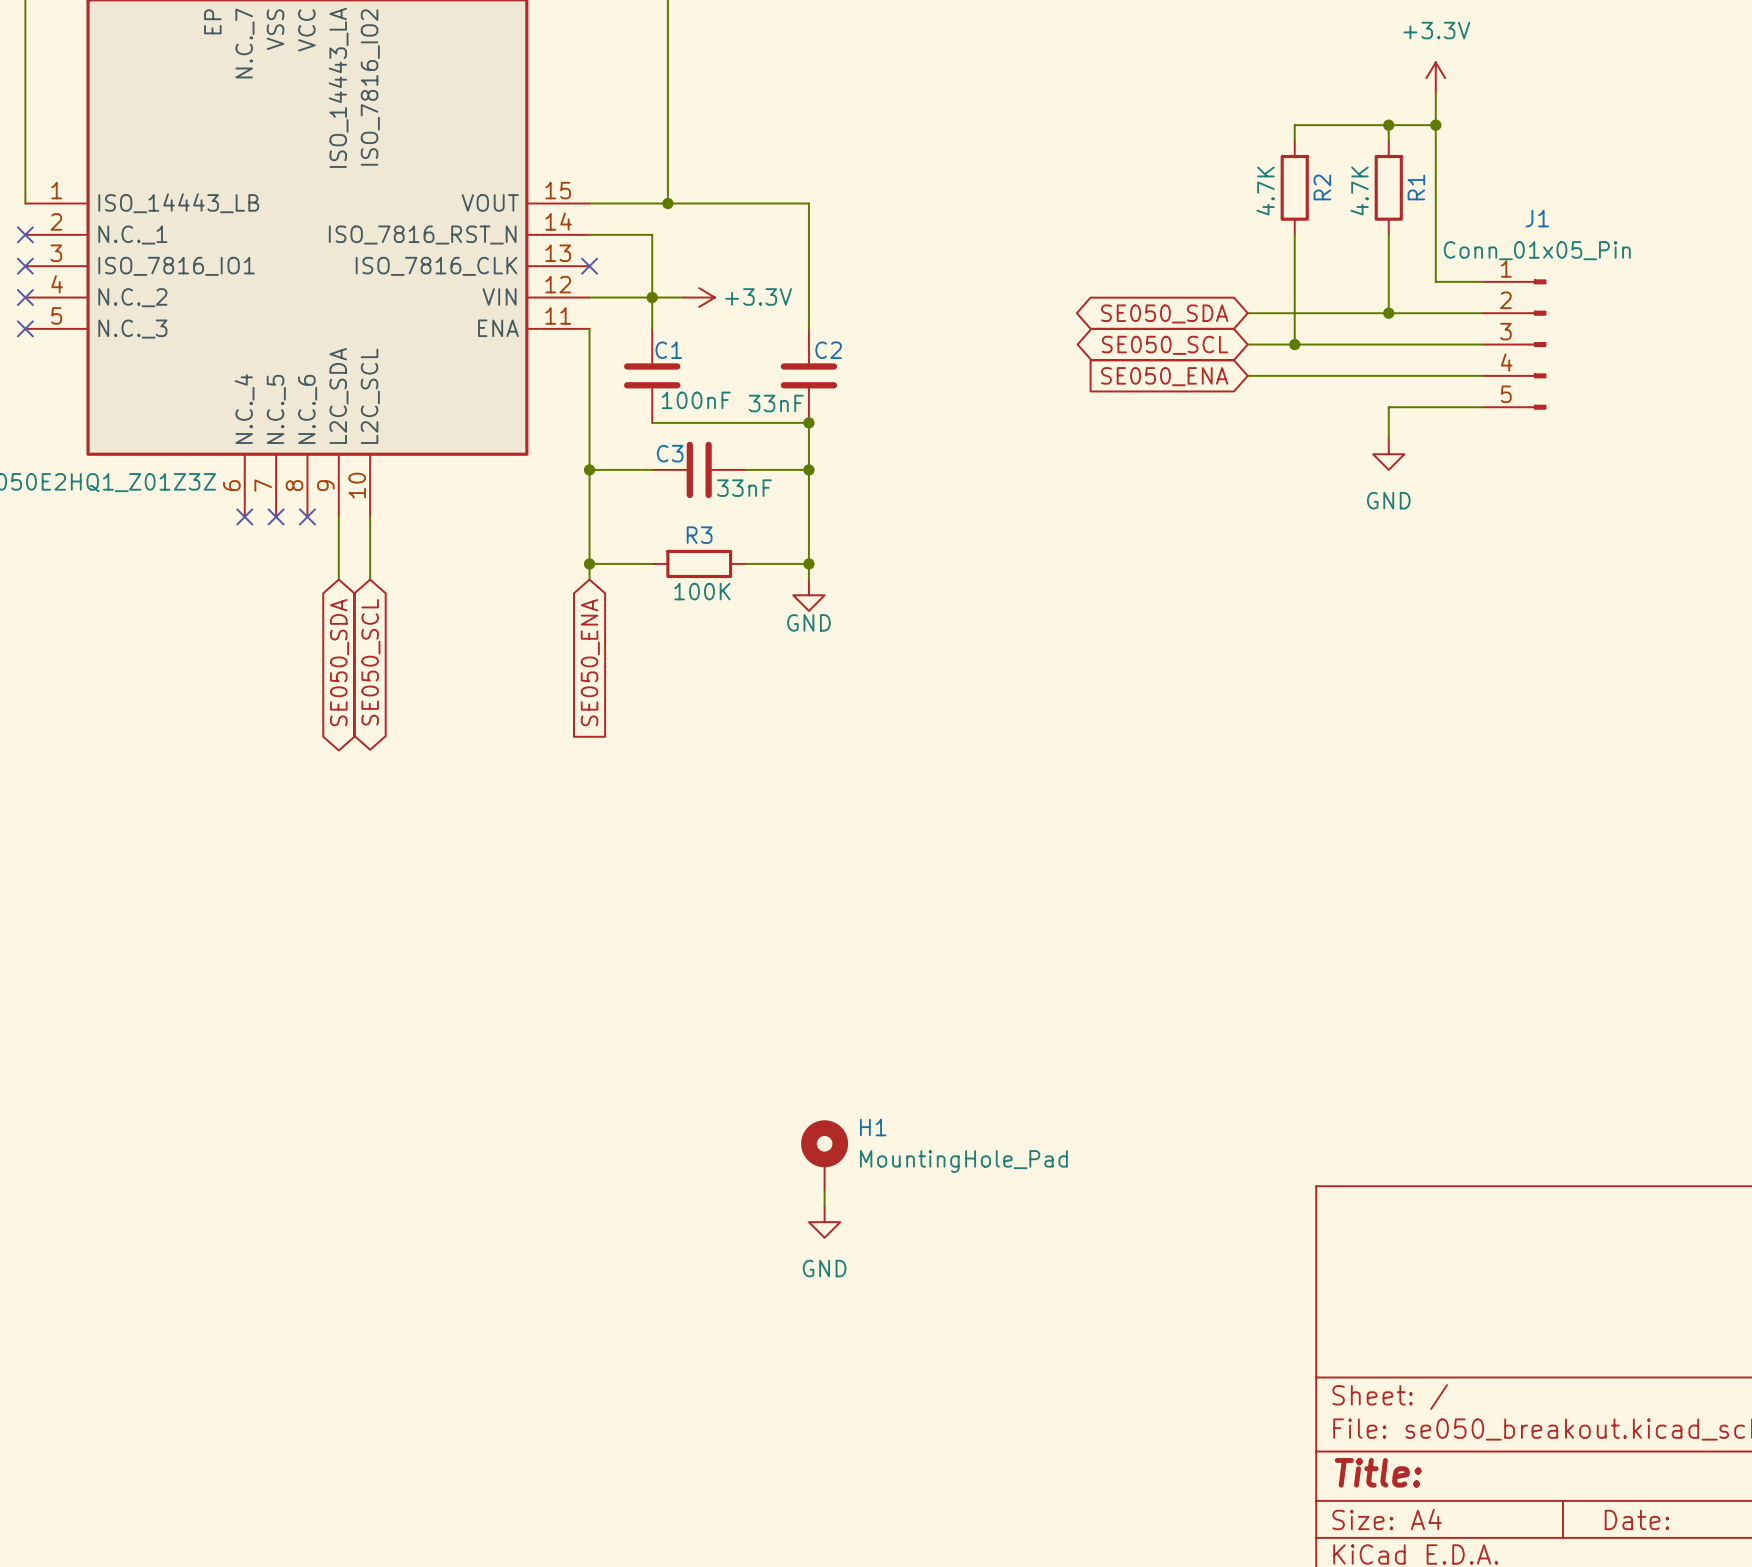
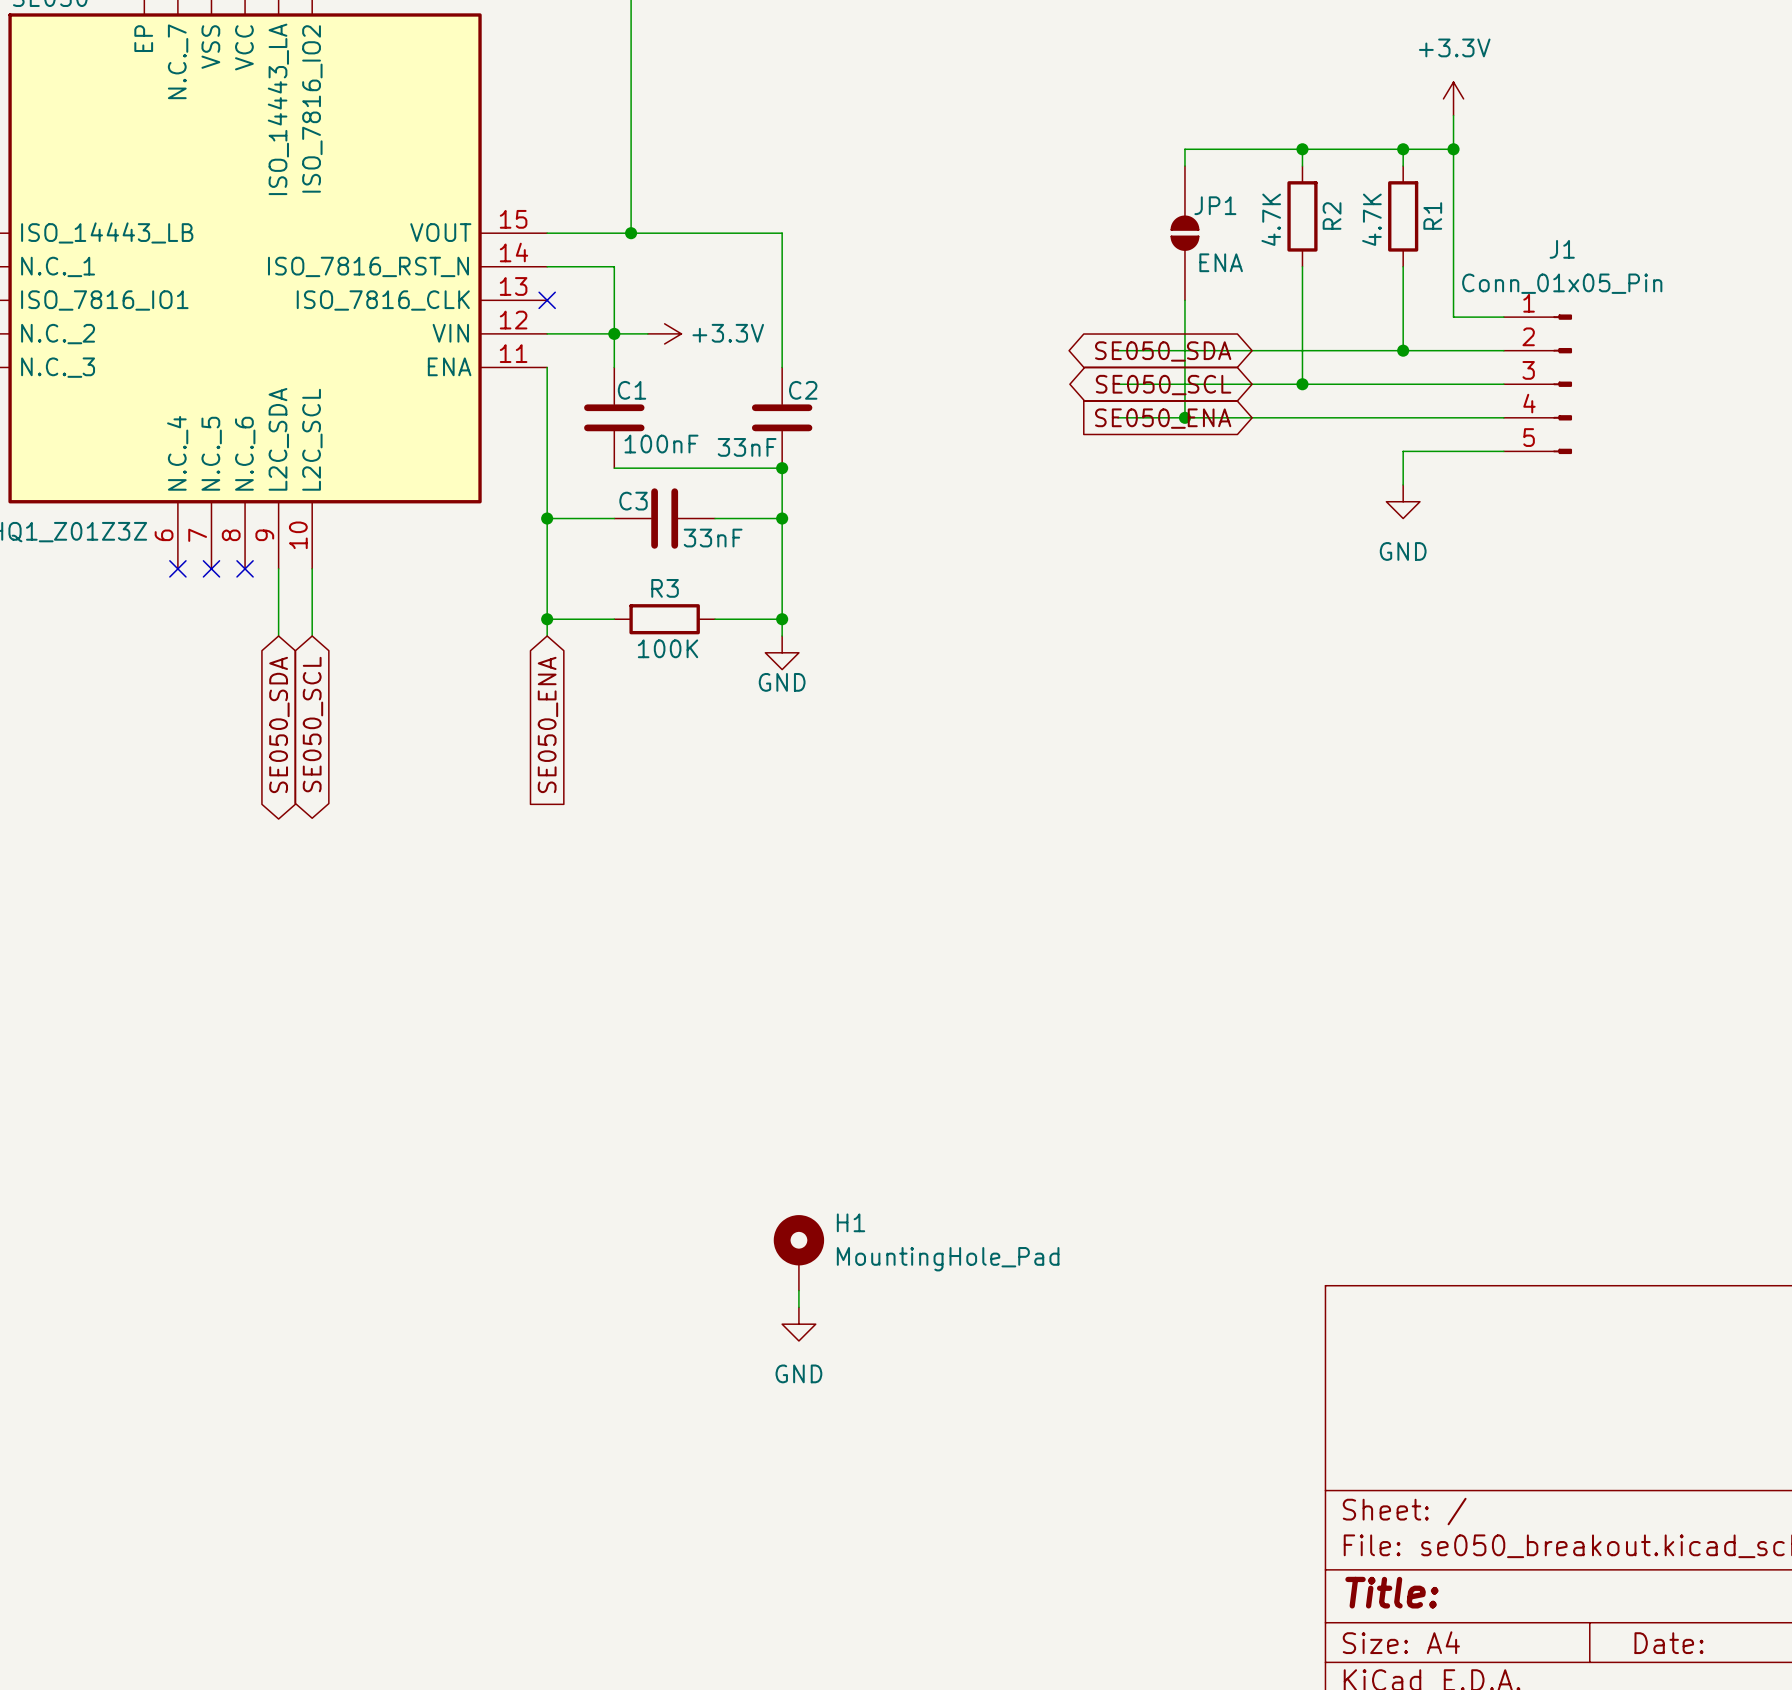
wire: none -> (1302, 149) (1184, 149) (1184, 166)
junction: none -> (1302, 149)
JP1: none -> ENA (1184, 233)
wire: none -> (1184, 300) (1184, 417)
wire: none -> (1117, 350) (1252, 350)
wire: none -> (1117, 384) (1252, 384)
wire: none -> (1117, 417) (1252, 417)
junction: none -> (1184, 417)

